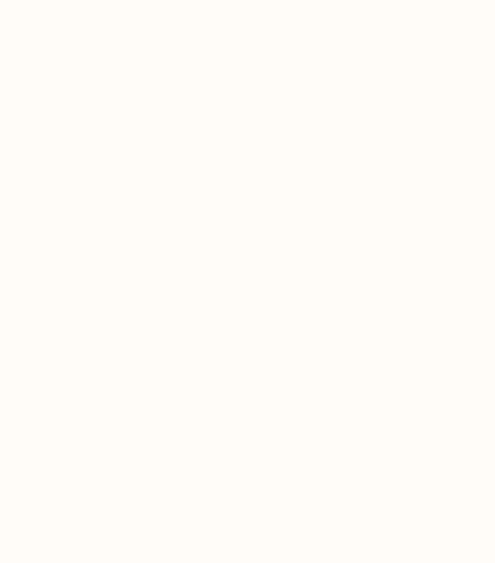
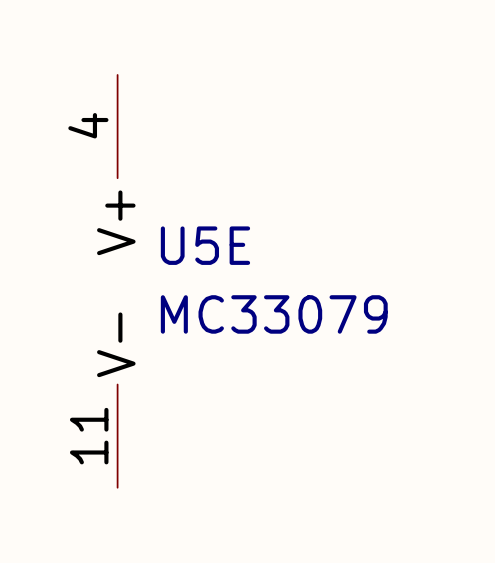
U5E: none -> MC33079 (117, 281)

